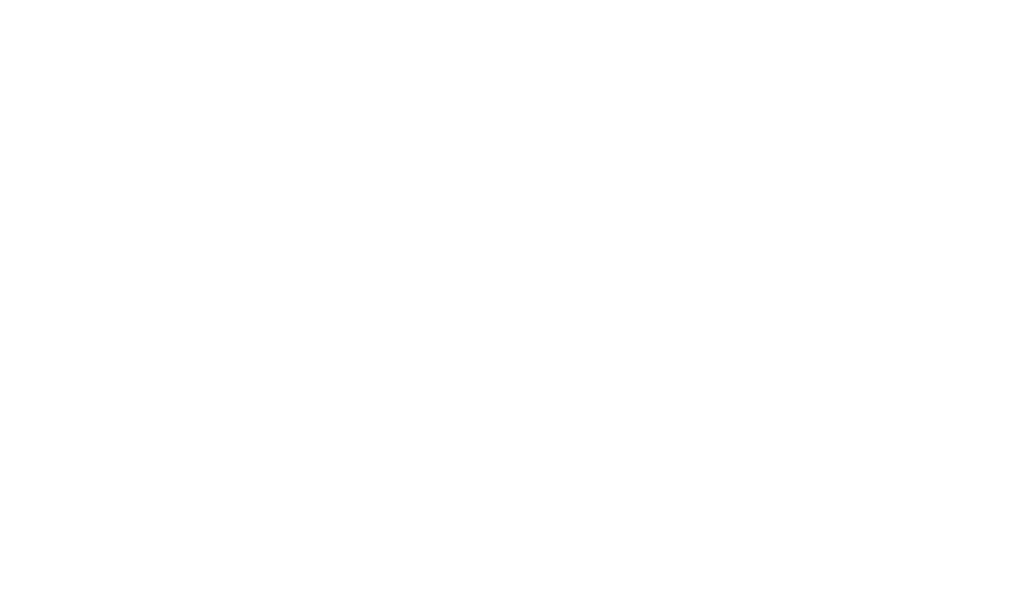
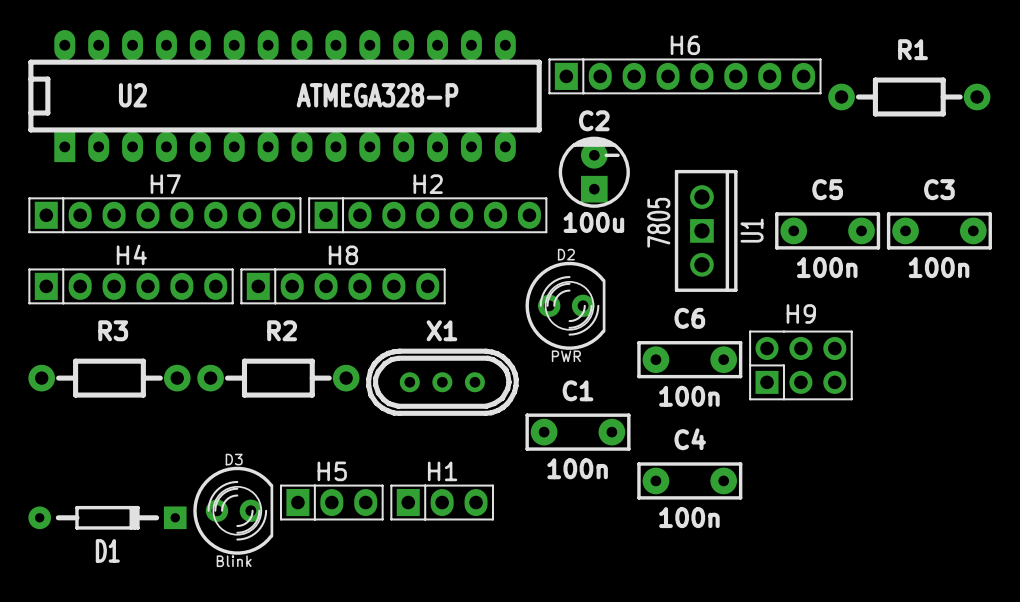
H6: none -> (684, 76)
U2: none -> ATMEGA328-P (285, 96)
R1: none -> (909, 97)
C2: none -> 100u (594, 172)
H7: none -> (164, 215)
H2: none -> (427, 215)
U1: none -> 7805 (706, 230)
C5: none -> 100n (827, 230)
C3: none -> 100n (939, 230)
H4: none -> (131, 286)
H8: none -> (343, 286)
D2: none -> PWR (565, 305)
C6: none -> 100n (689, 359)
H9: none -> (800, 365)
R3: none -> (109, 378)
R2: none -> (278, 378)
X1: none -> (442, 382)
C1: none -> 100n (578, 432)
C4: none -> 100n (689, 480)
H5: none -> (331, 502)
H1: none -> (442, 502)
D3: none -> Blink (233, 510)
D1: none -> (107, 517)

